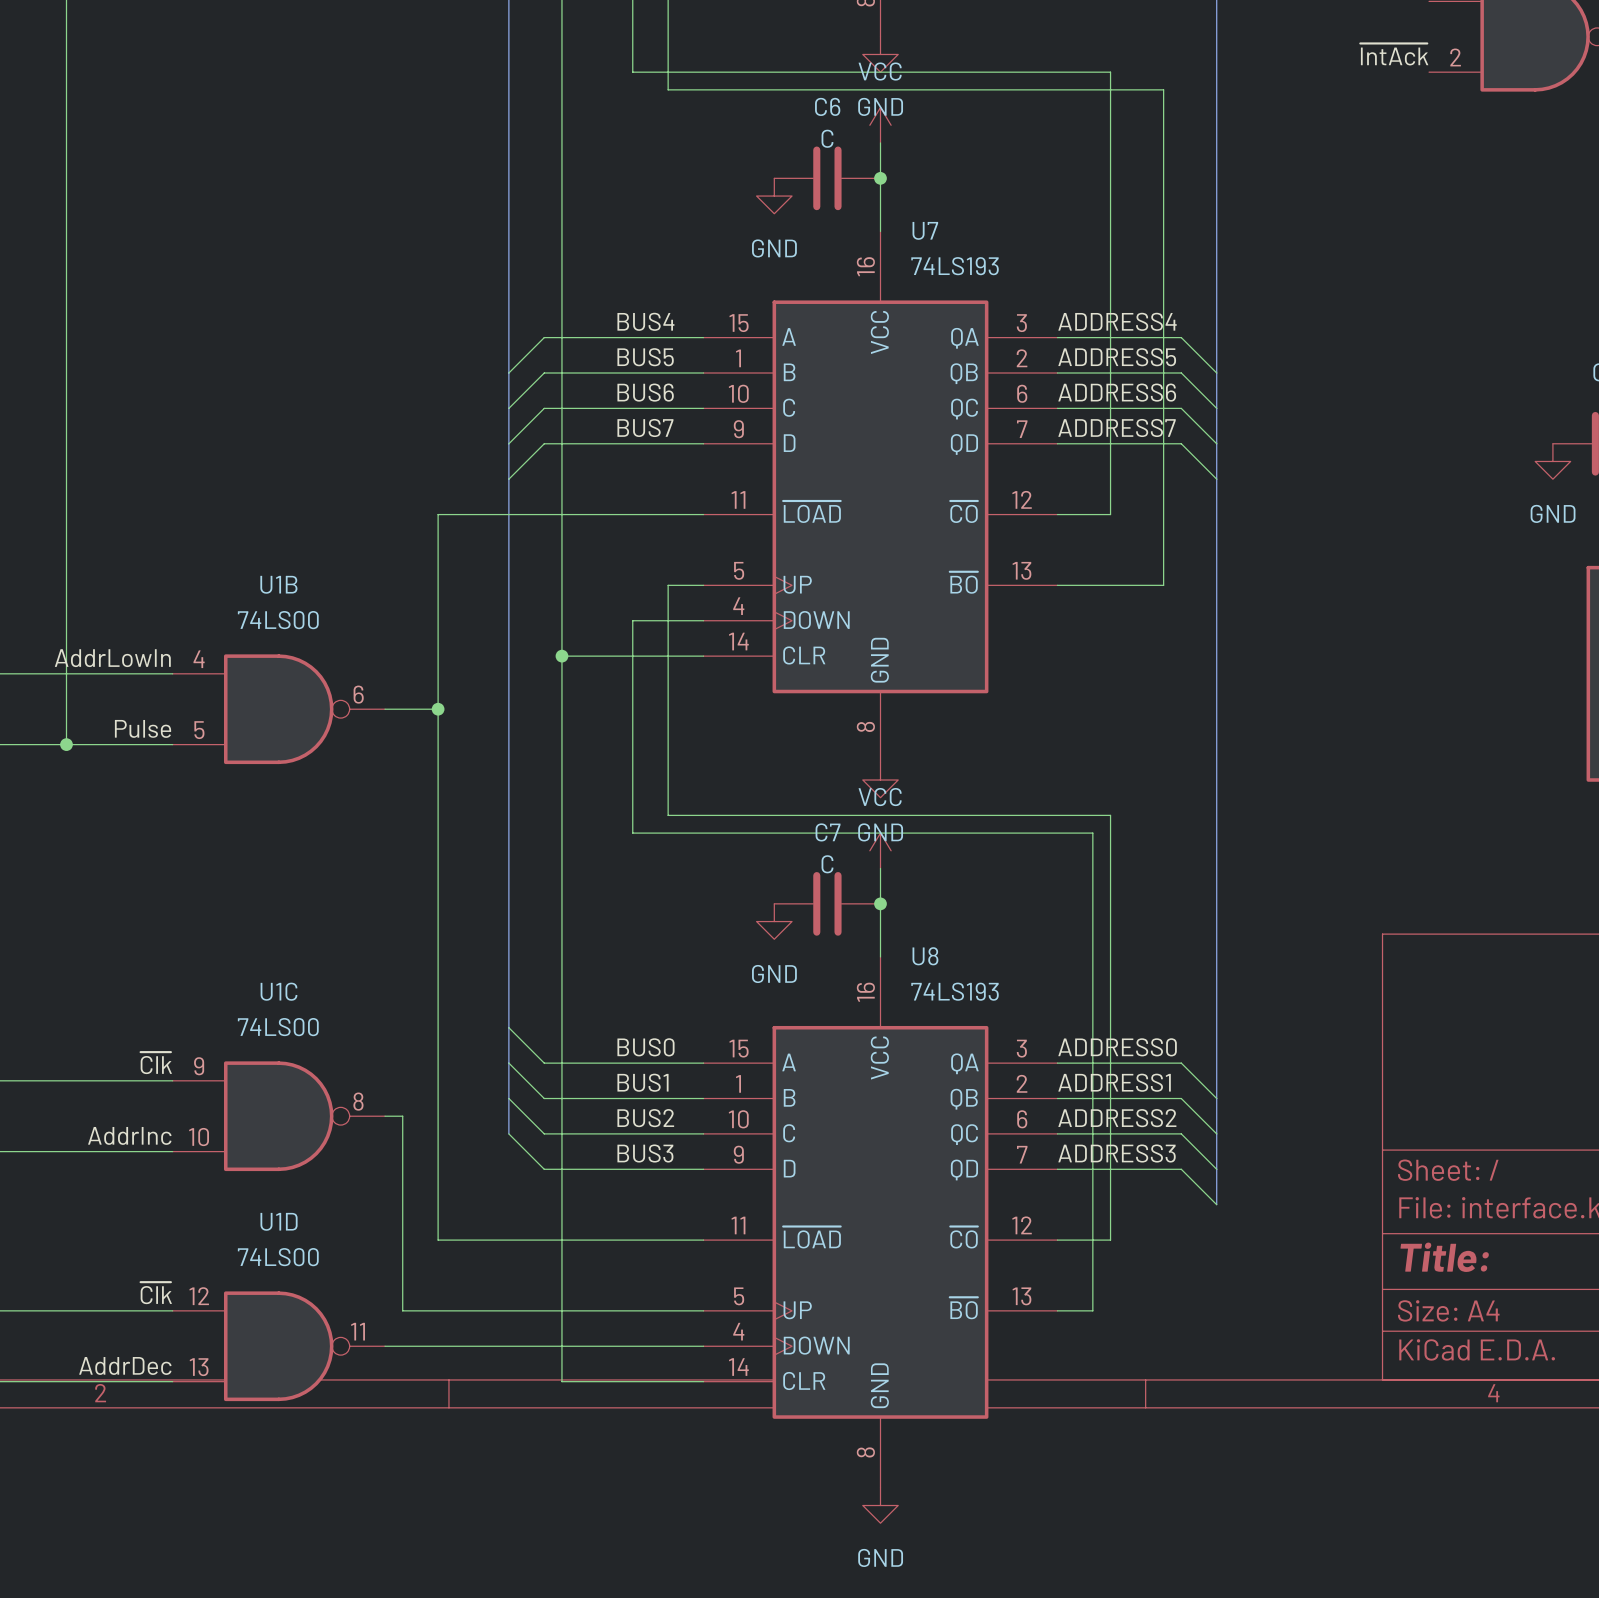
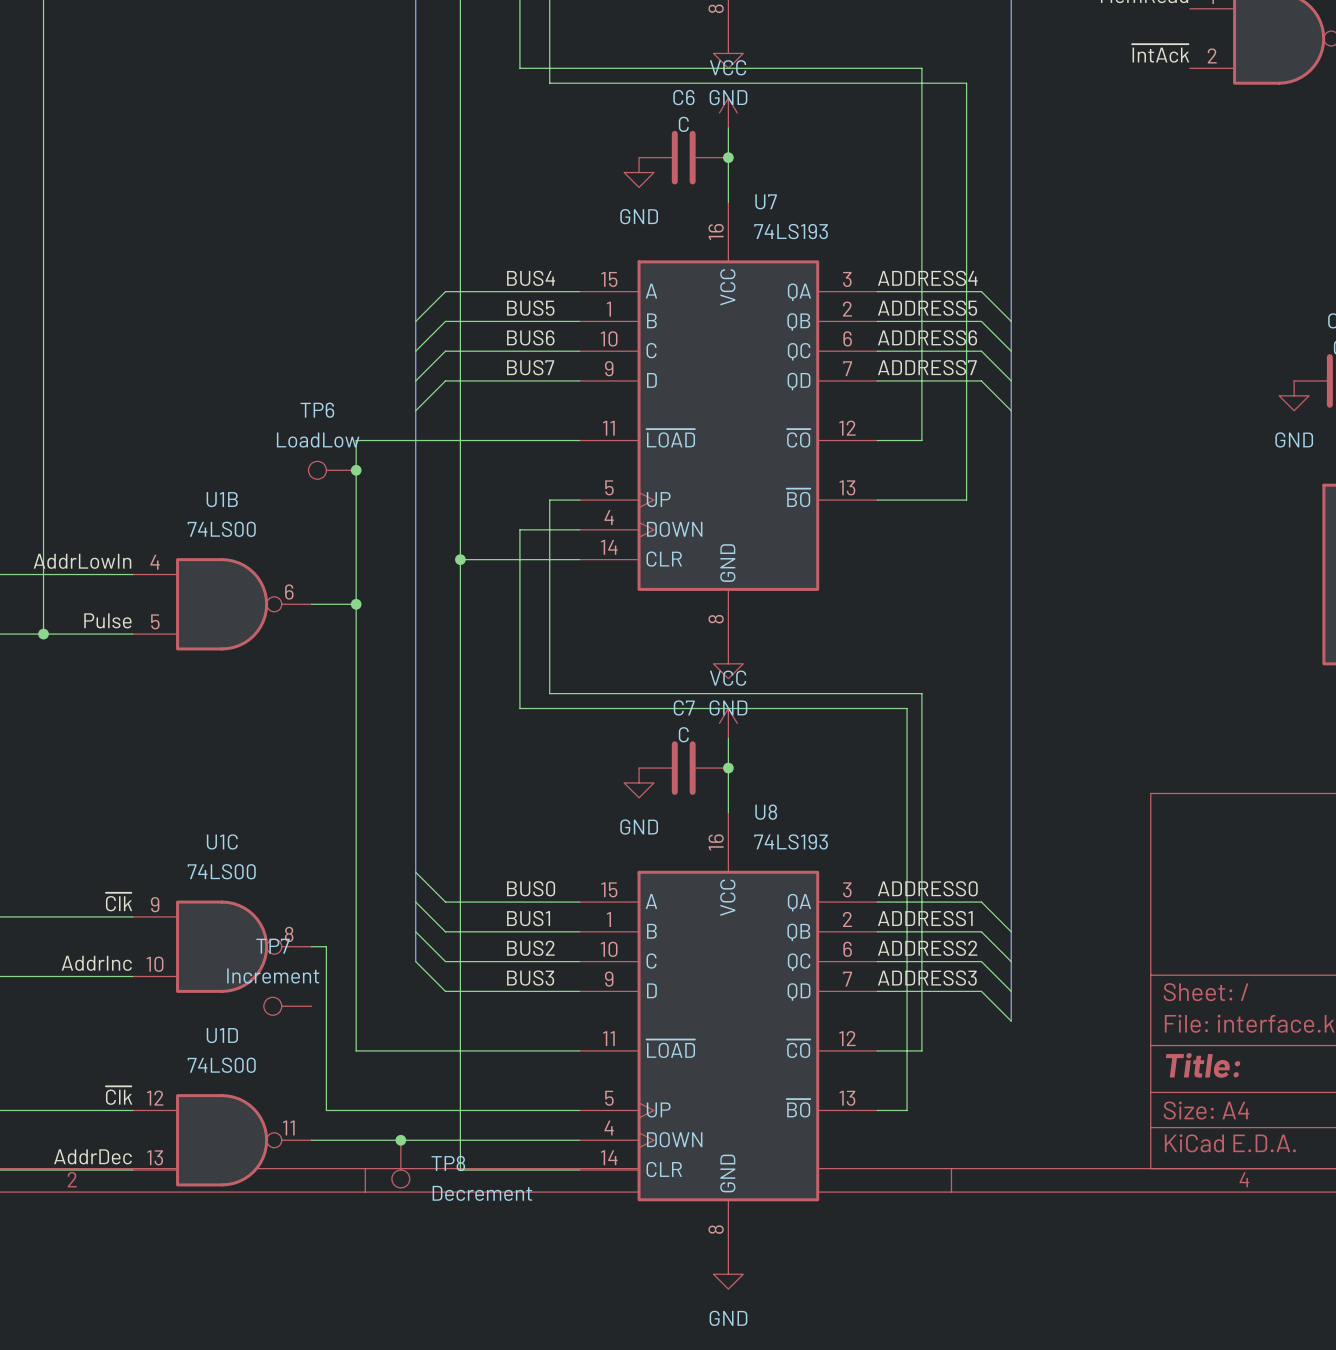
TP6: none -> LoadLow (332, 470)
junction: none -> (356, 470)
TP7: none -> Increment (287, 1006)
junction: none -> (400, 1140)
TP8: none -> Decrement (400, 1164)

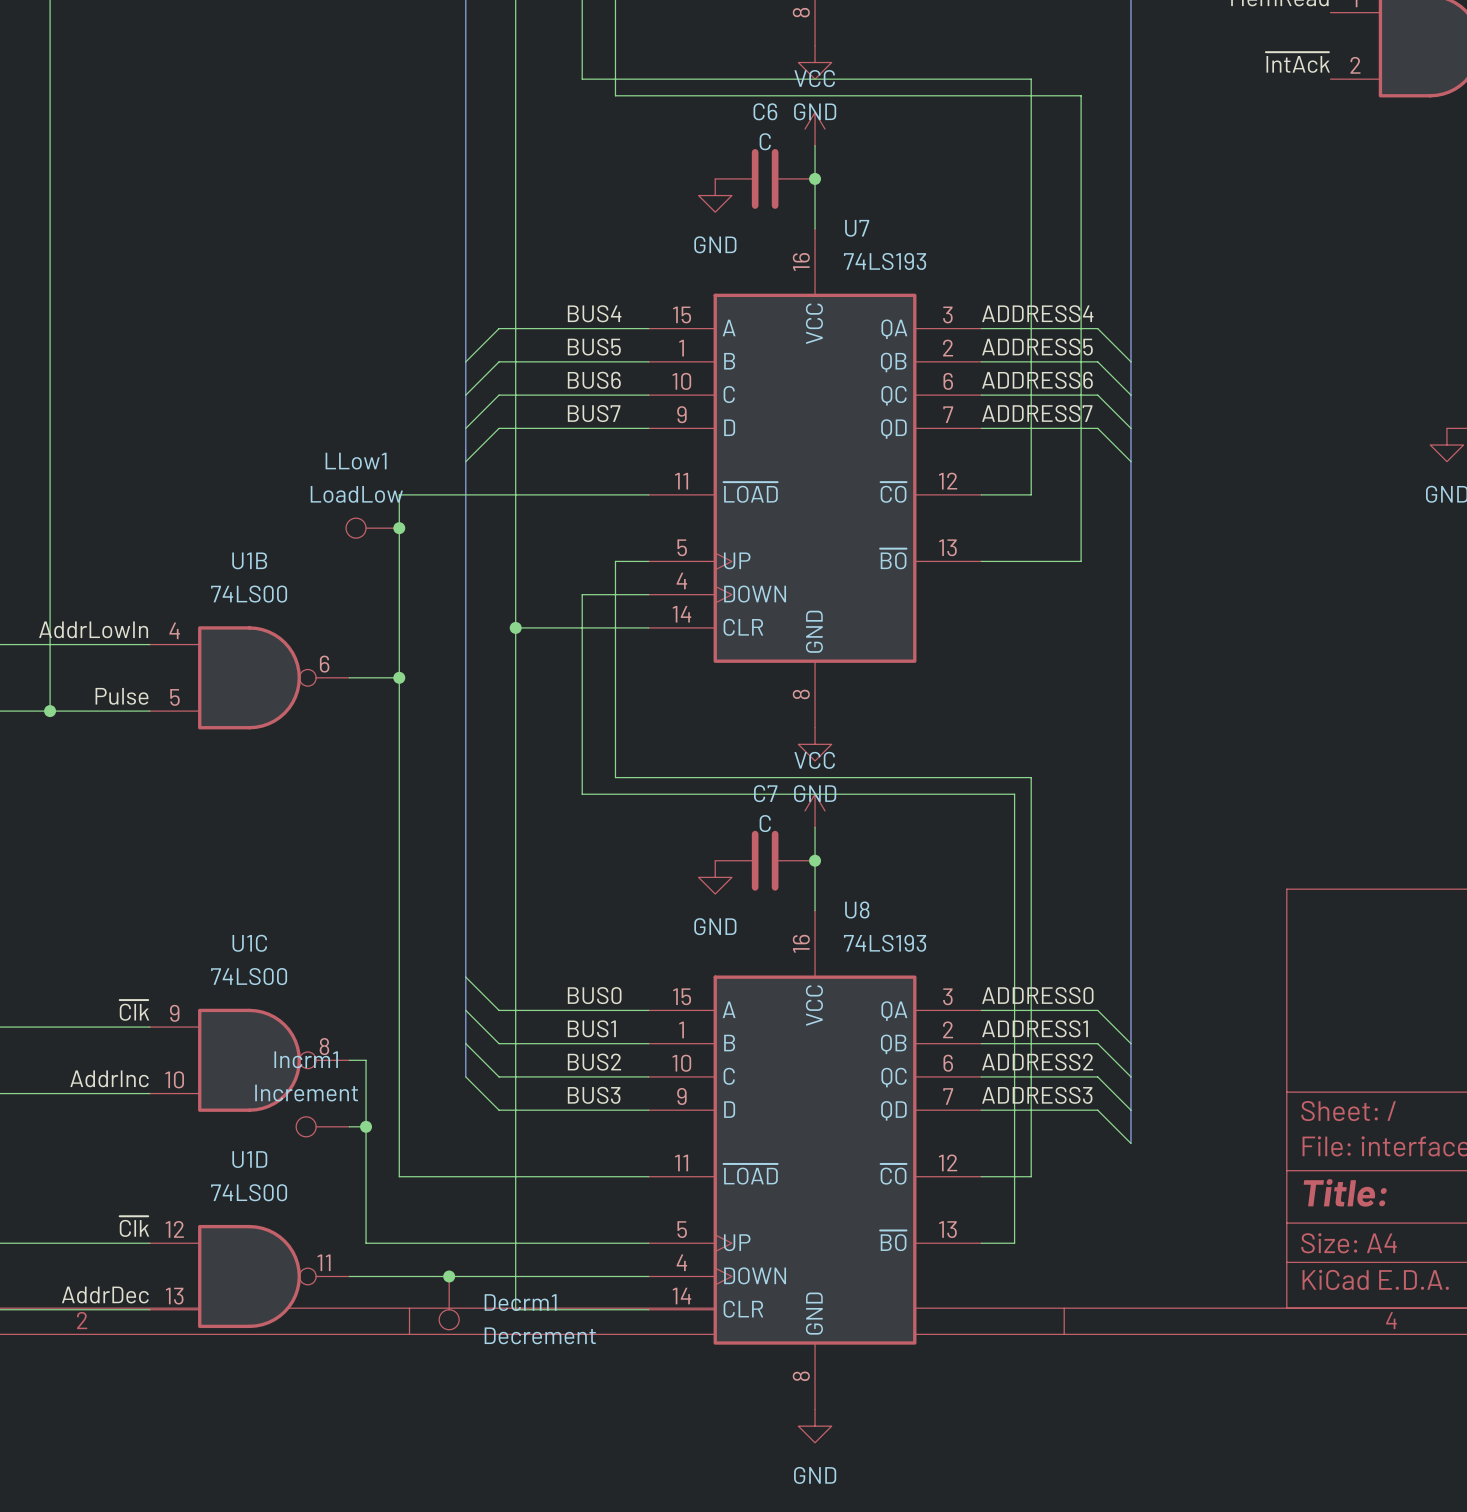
TP6 name: TP6 (317, 410) -> LLow1 (356, 461)
TP7 name: TP7 (273, 946) -> Incrm1 (306, 1059)
wire: none -> (349, 1126) (366, 1126)
junction: none -> (366, 1126)
TP8 name: TP8 (448, 1163) -> Decrm1 (520, 1302)

